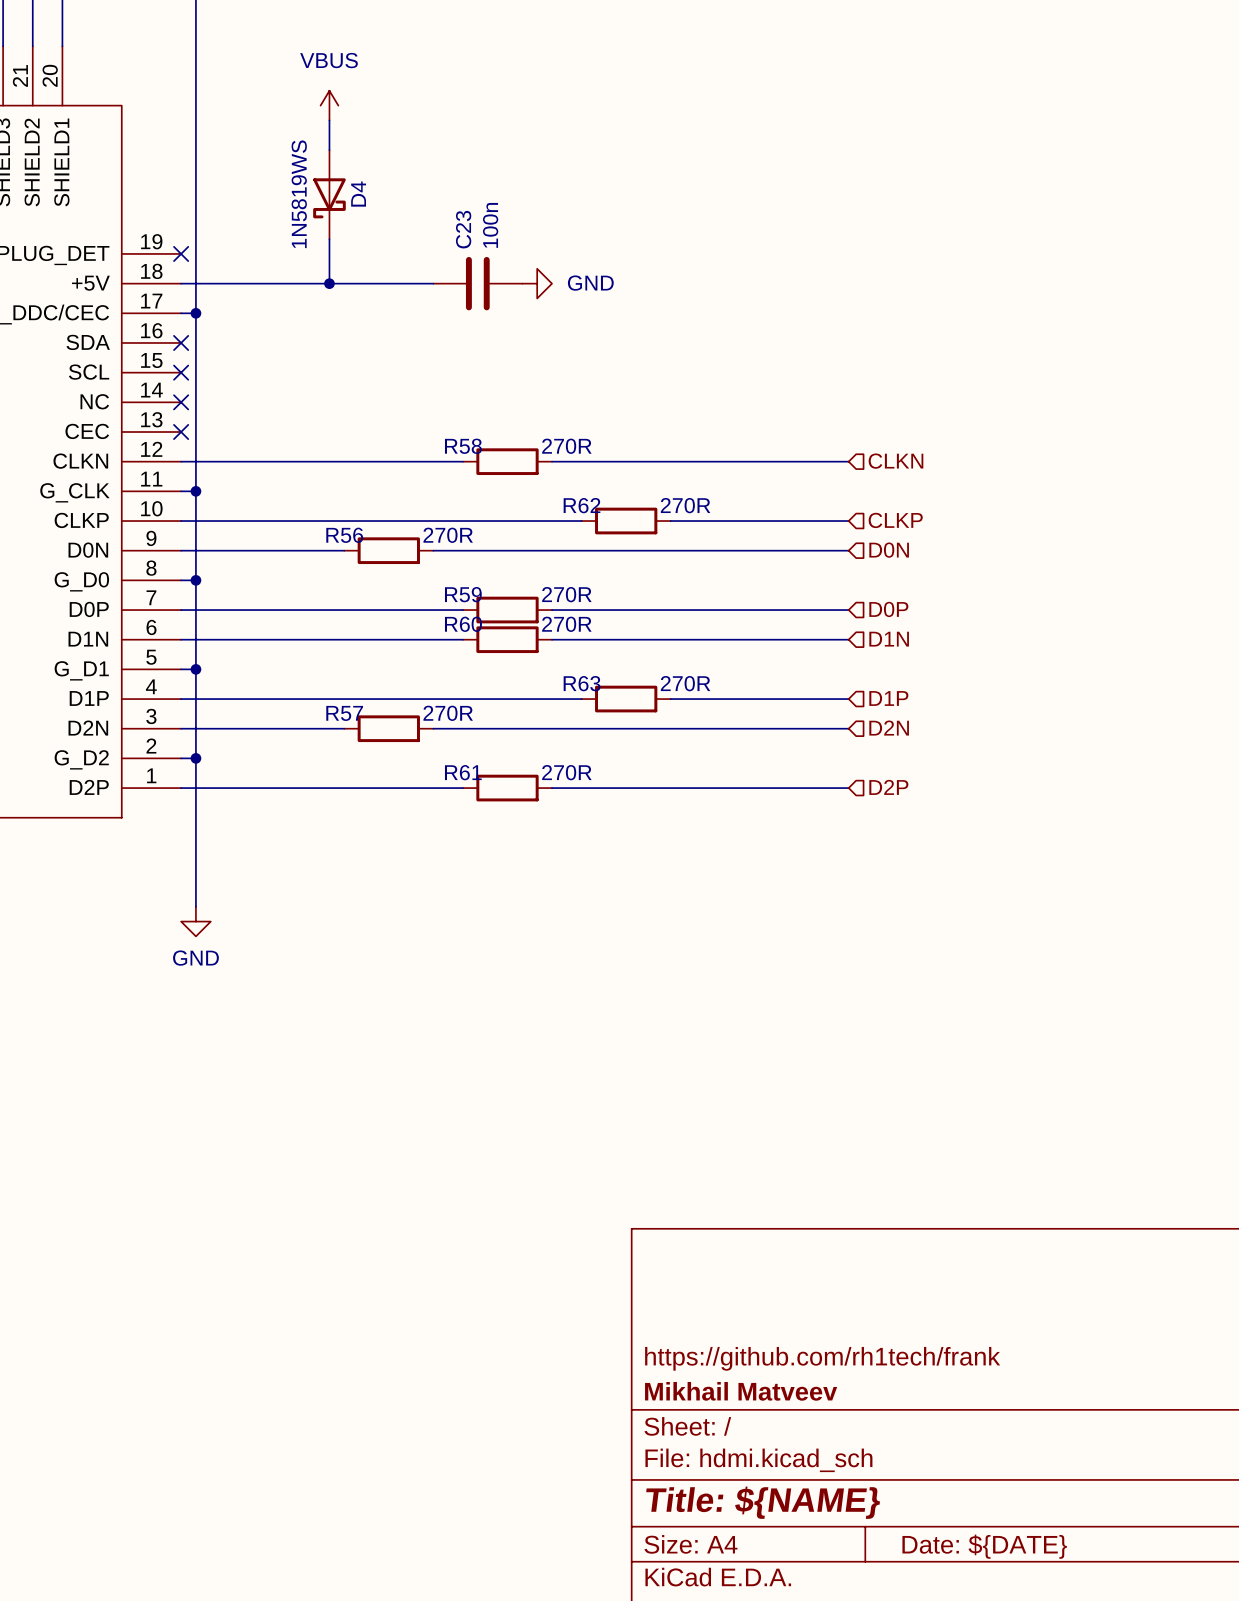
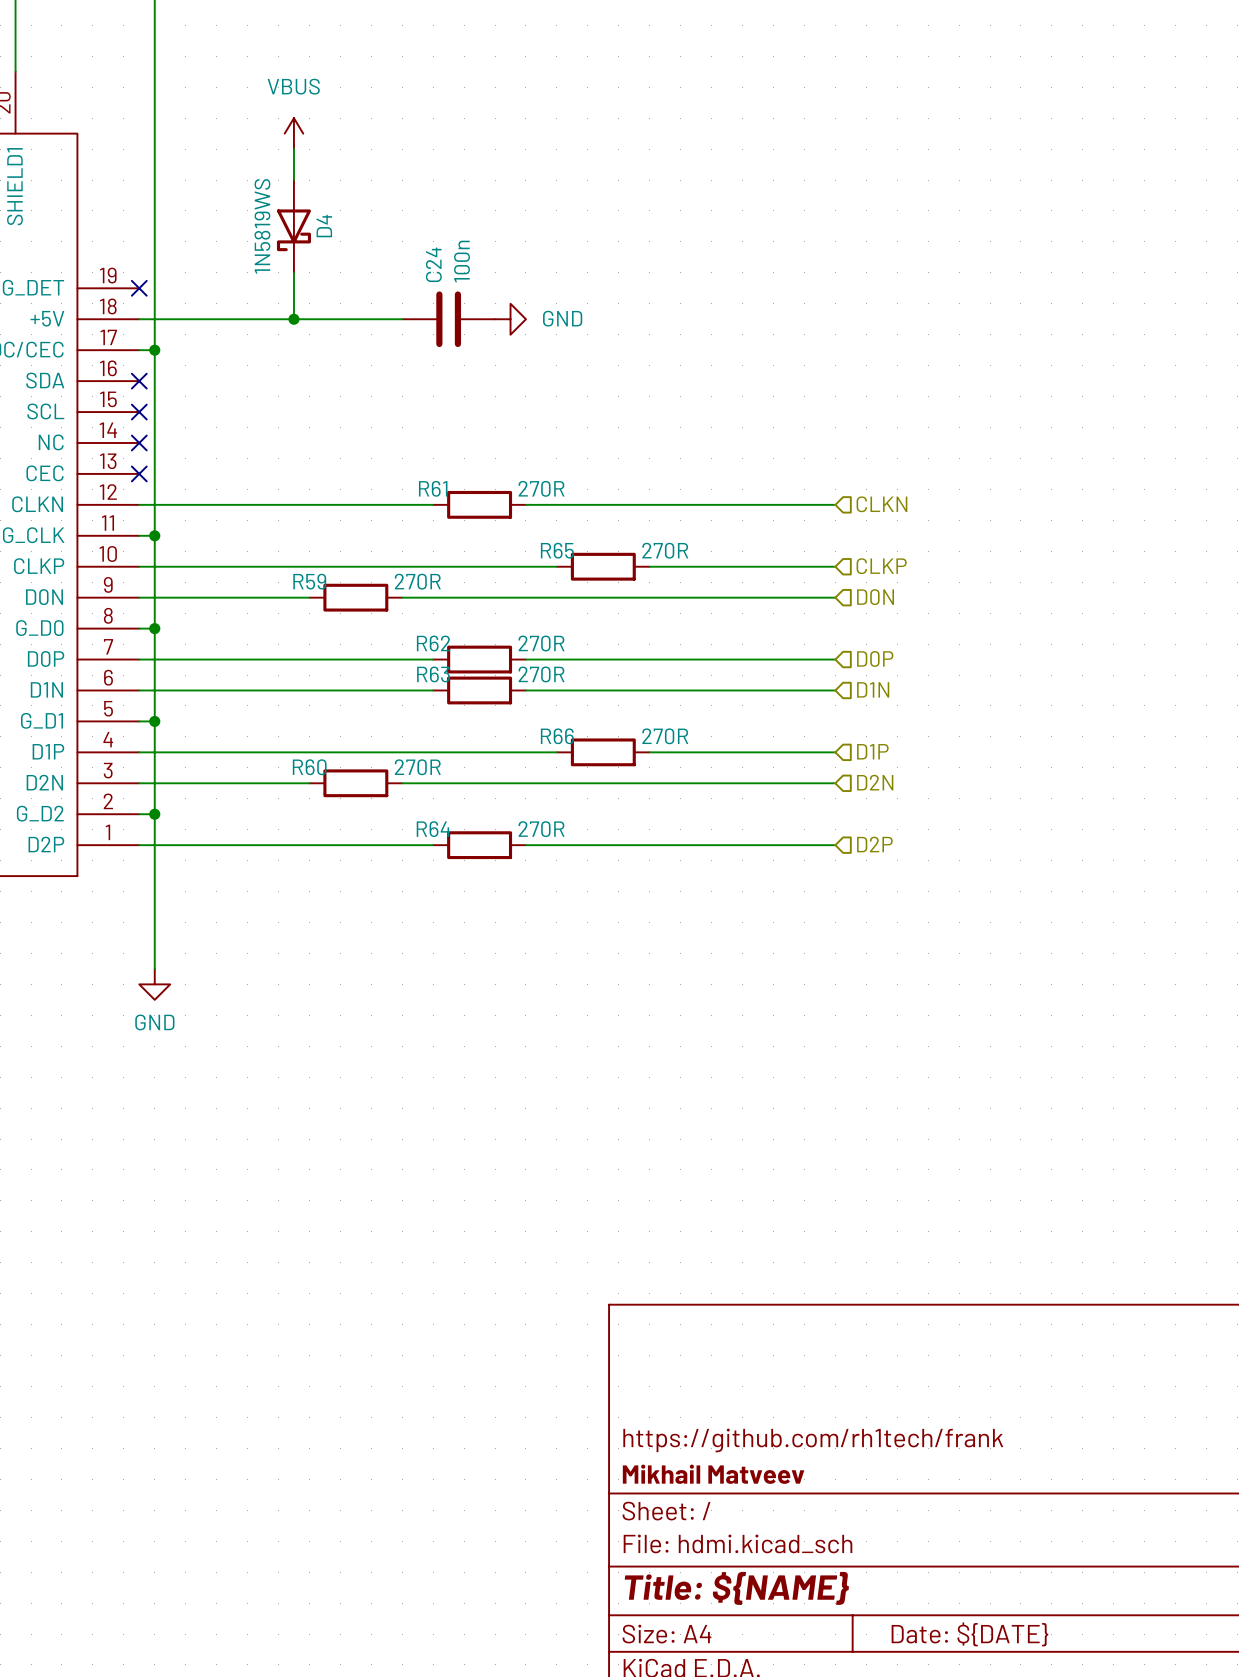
C23 name: C23 (463, 229) -> C24 (433, 264)
R58 name: R58 (463, 446) -> R61 (433, 488)
R62 name: R62 (582, 505) -> R65 (557, 550)
R56 name: R56 (344, 535) -> R59 (309, 581)
R59 name: R59 (463, 594) -> R62 (433, 643)
R60 name: R60 (463, 624) -> R63 (433, 674)
R63 name: R63 (582, 683) -> R66 (557, 736)
R57 name: R57 (344, 713) -> R60 (309, 767)
R61 name: R61 (463, 772) -> R64 (433, 829)

